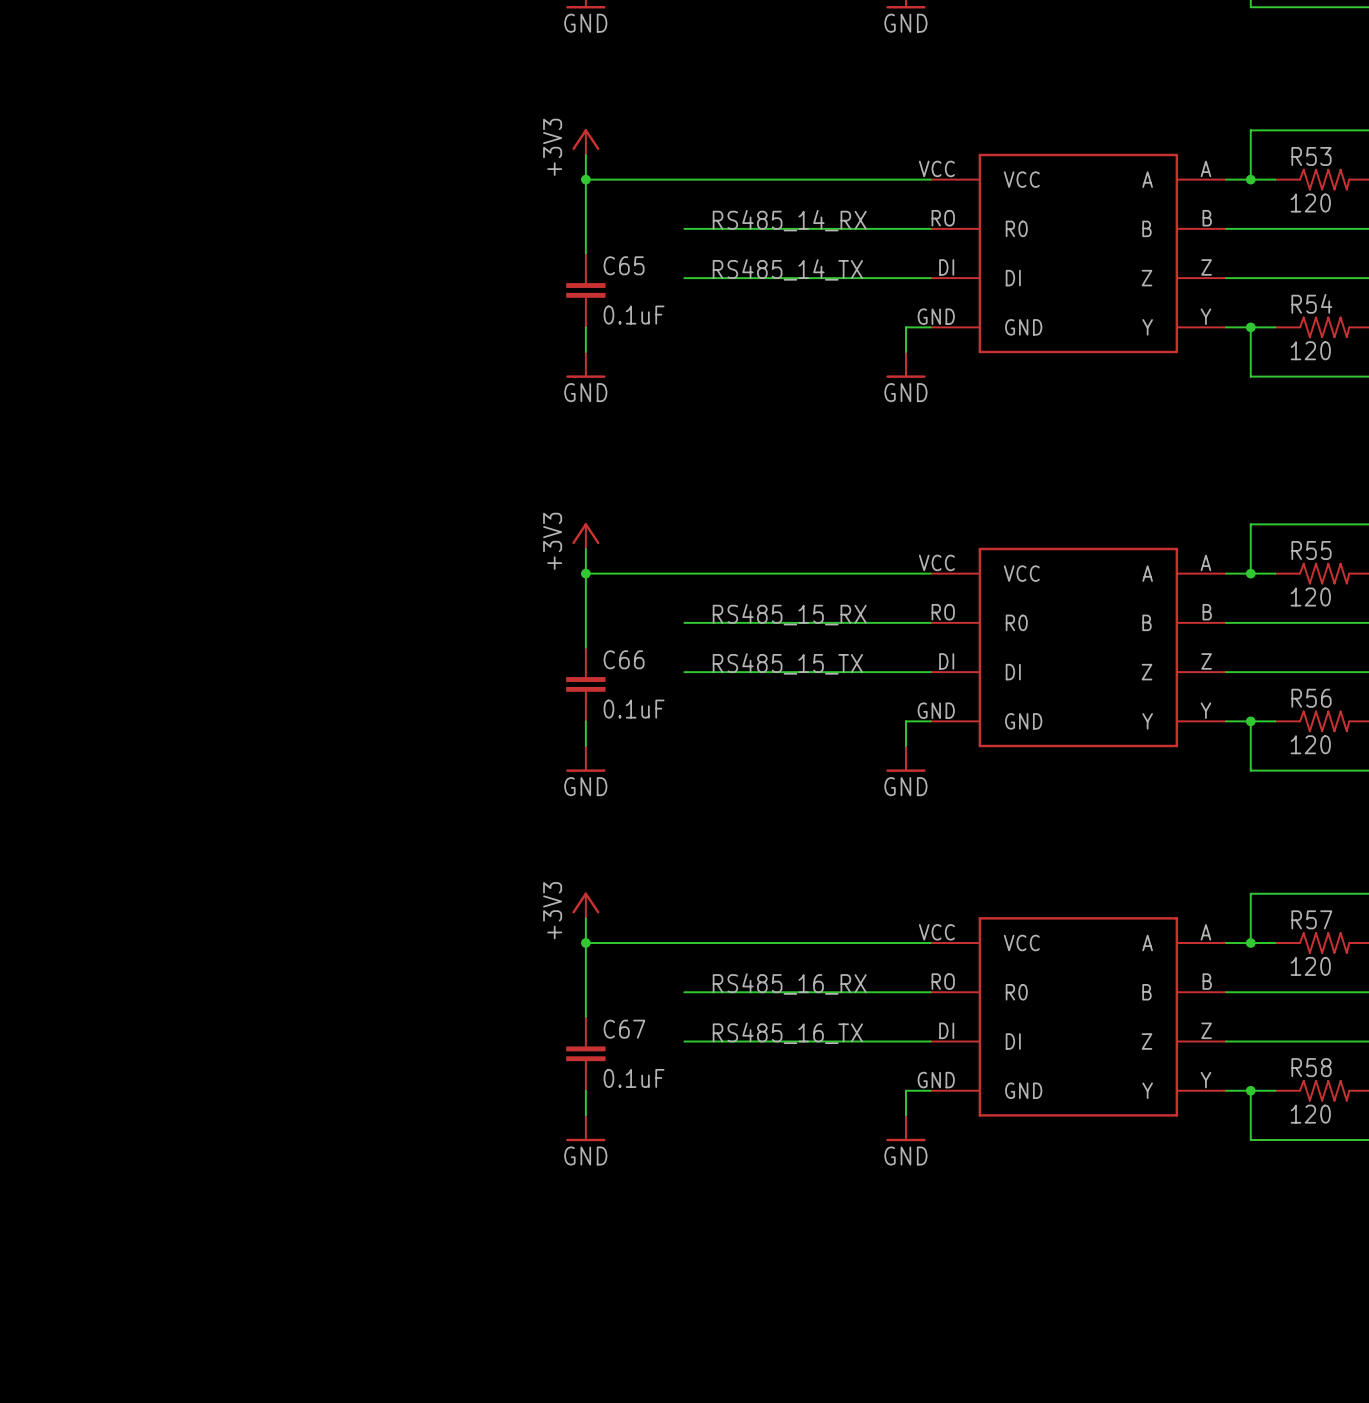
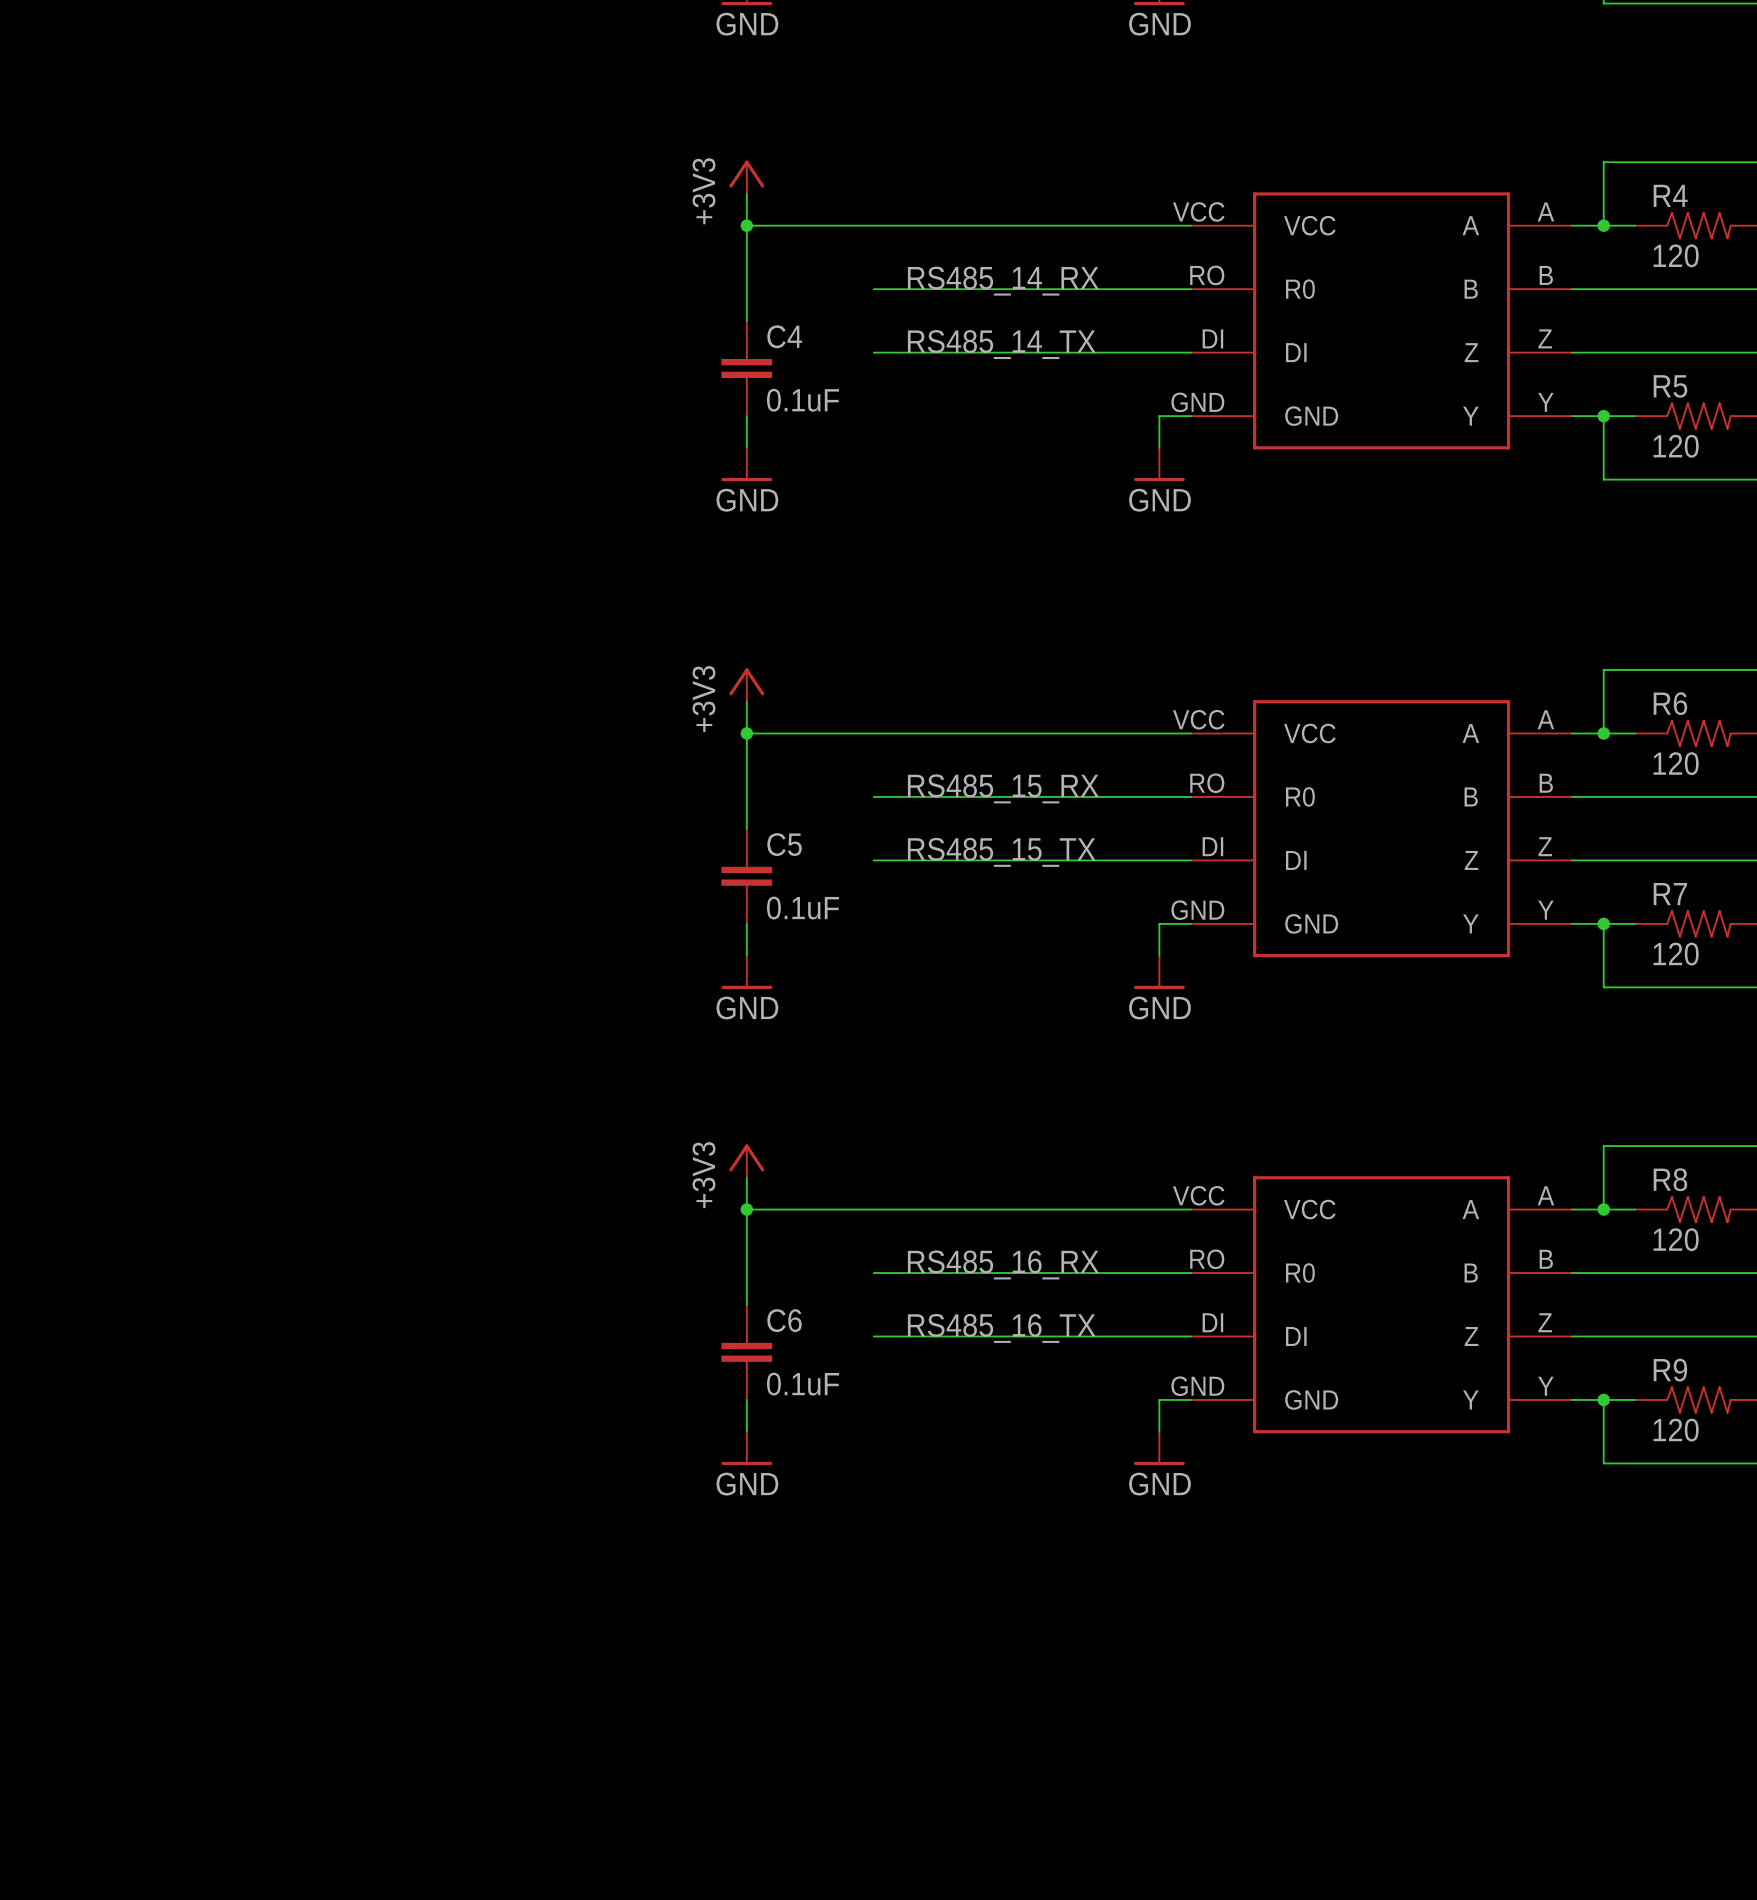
R53 name: R53 (1311, 156) -> R4 (1670, 195)
C65 name: C65 (624, 265) -> C4 (784, 336)
R54 name: R54 (1311, 303) -> R5 (1670, 386)
R55 name: R55 (1311, 550) -> R6 (1670, 703)
C66 name: C66 (624, 659) -> C5 (784, 844)
R56 name: R56 (1311, 698) -> R7 (1670, 894)
R57 name: R57 (1311, 919) -> R8 (1670, 1179)
C67 name: C67 (624, 1029) -> C6 (784, 1320)
R58 name: R58 (1311, 1067) -> R9 (1670, 1370)

